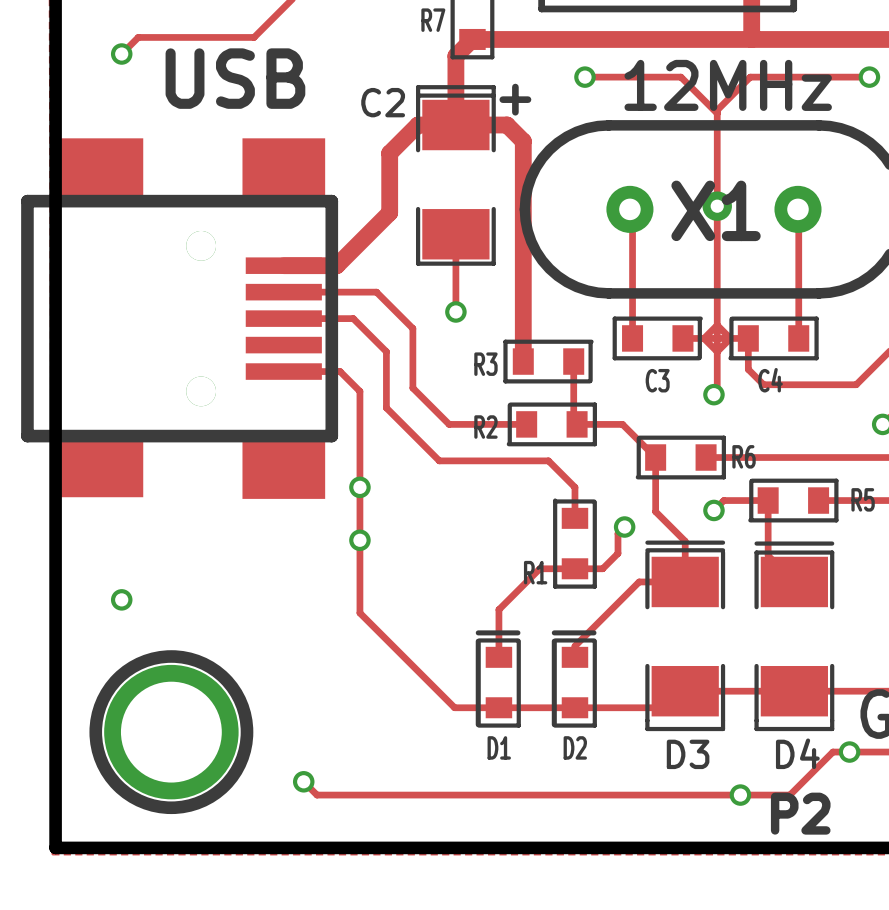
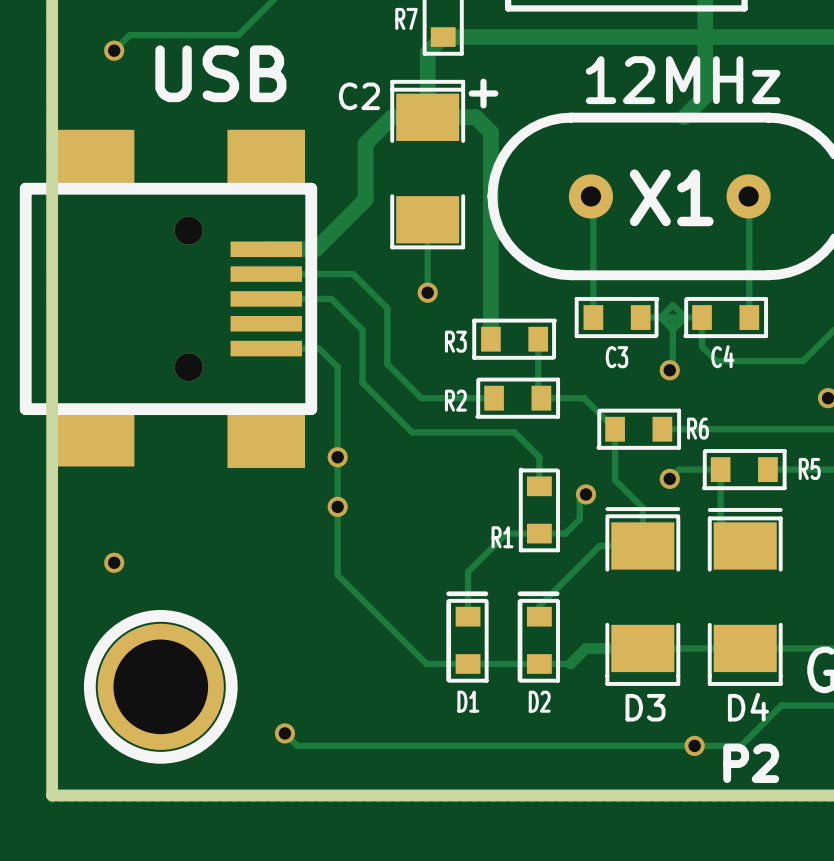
track: none -> (705, 37) (705, 96) (684, 117)
track: (584, 77) (680, 77) (717, 113) -> none
via: (584, 77) -> none
track: (869, 77) (750, 77) (717, 110) (717, 338) -> none
via: (869, 77) -> none
via: (717, 206) -> none
track: (685, 691) (668, 707) (608, 707) -> (642, 648) (586, 648) (570, 663)
via: (849, 752) -> none

